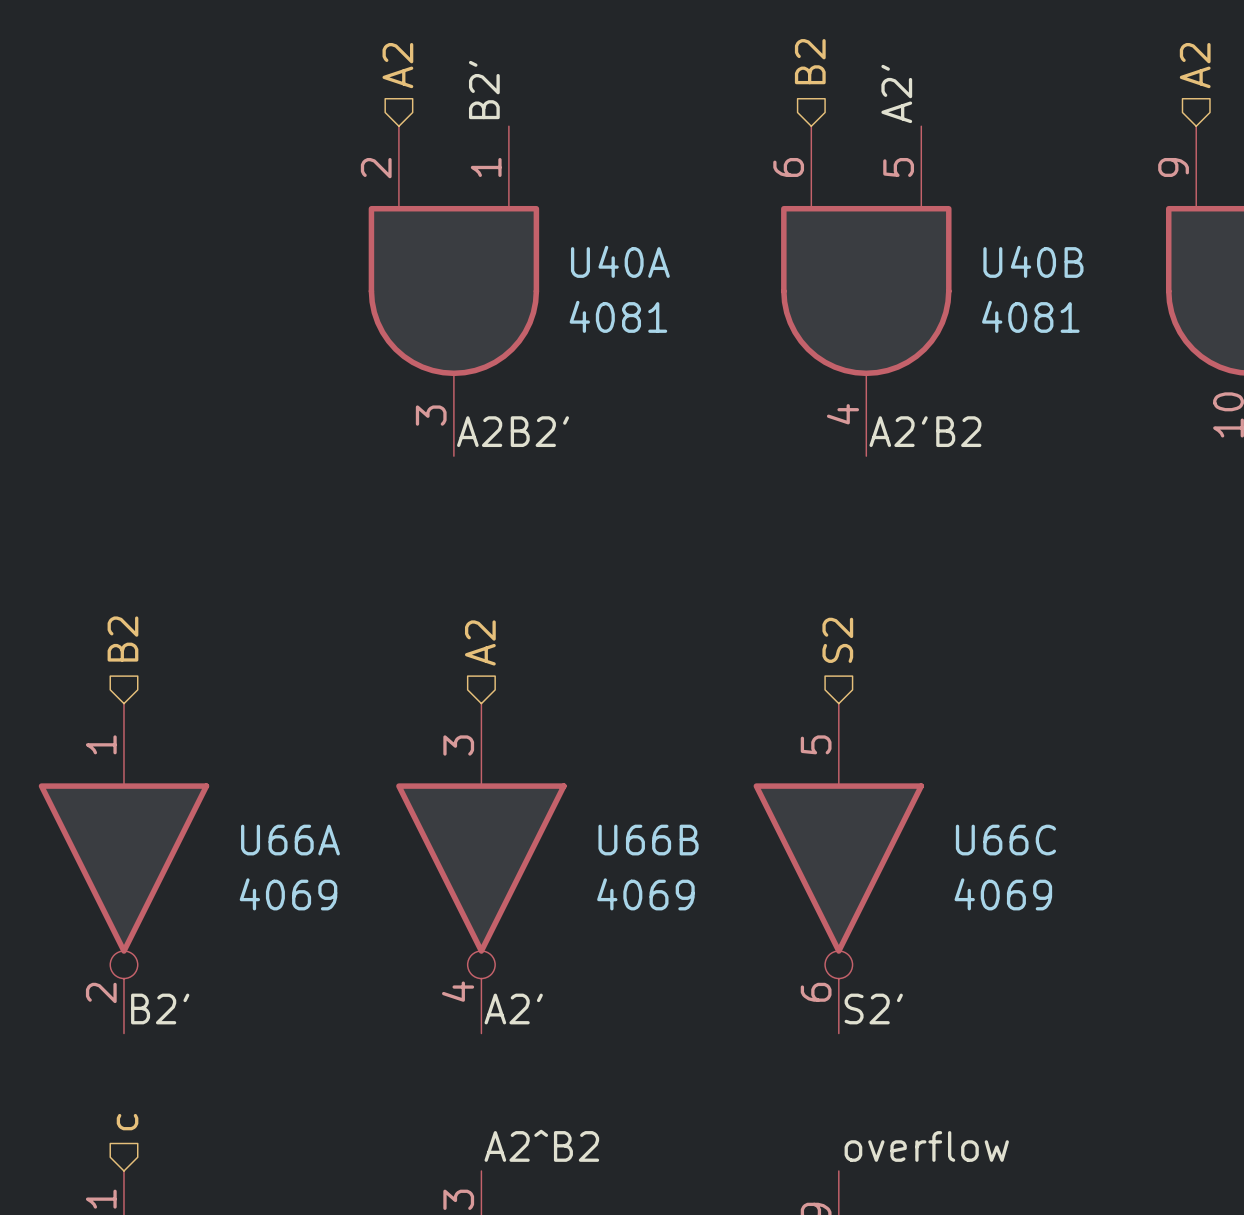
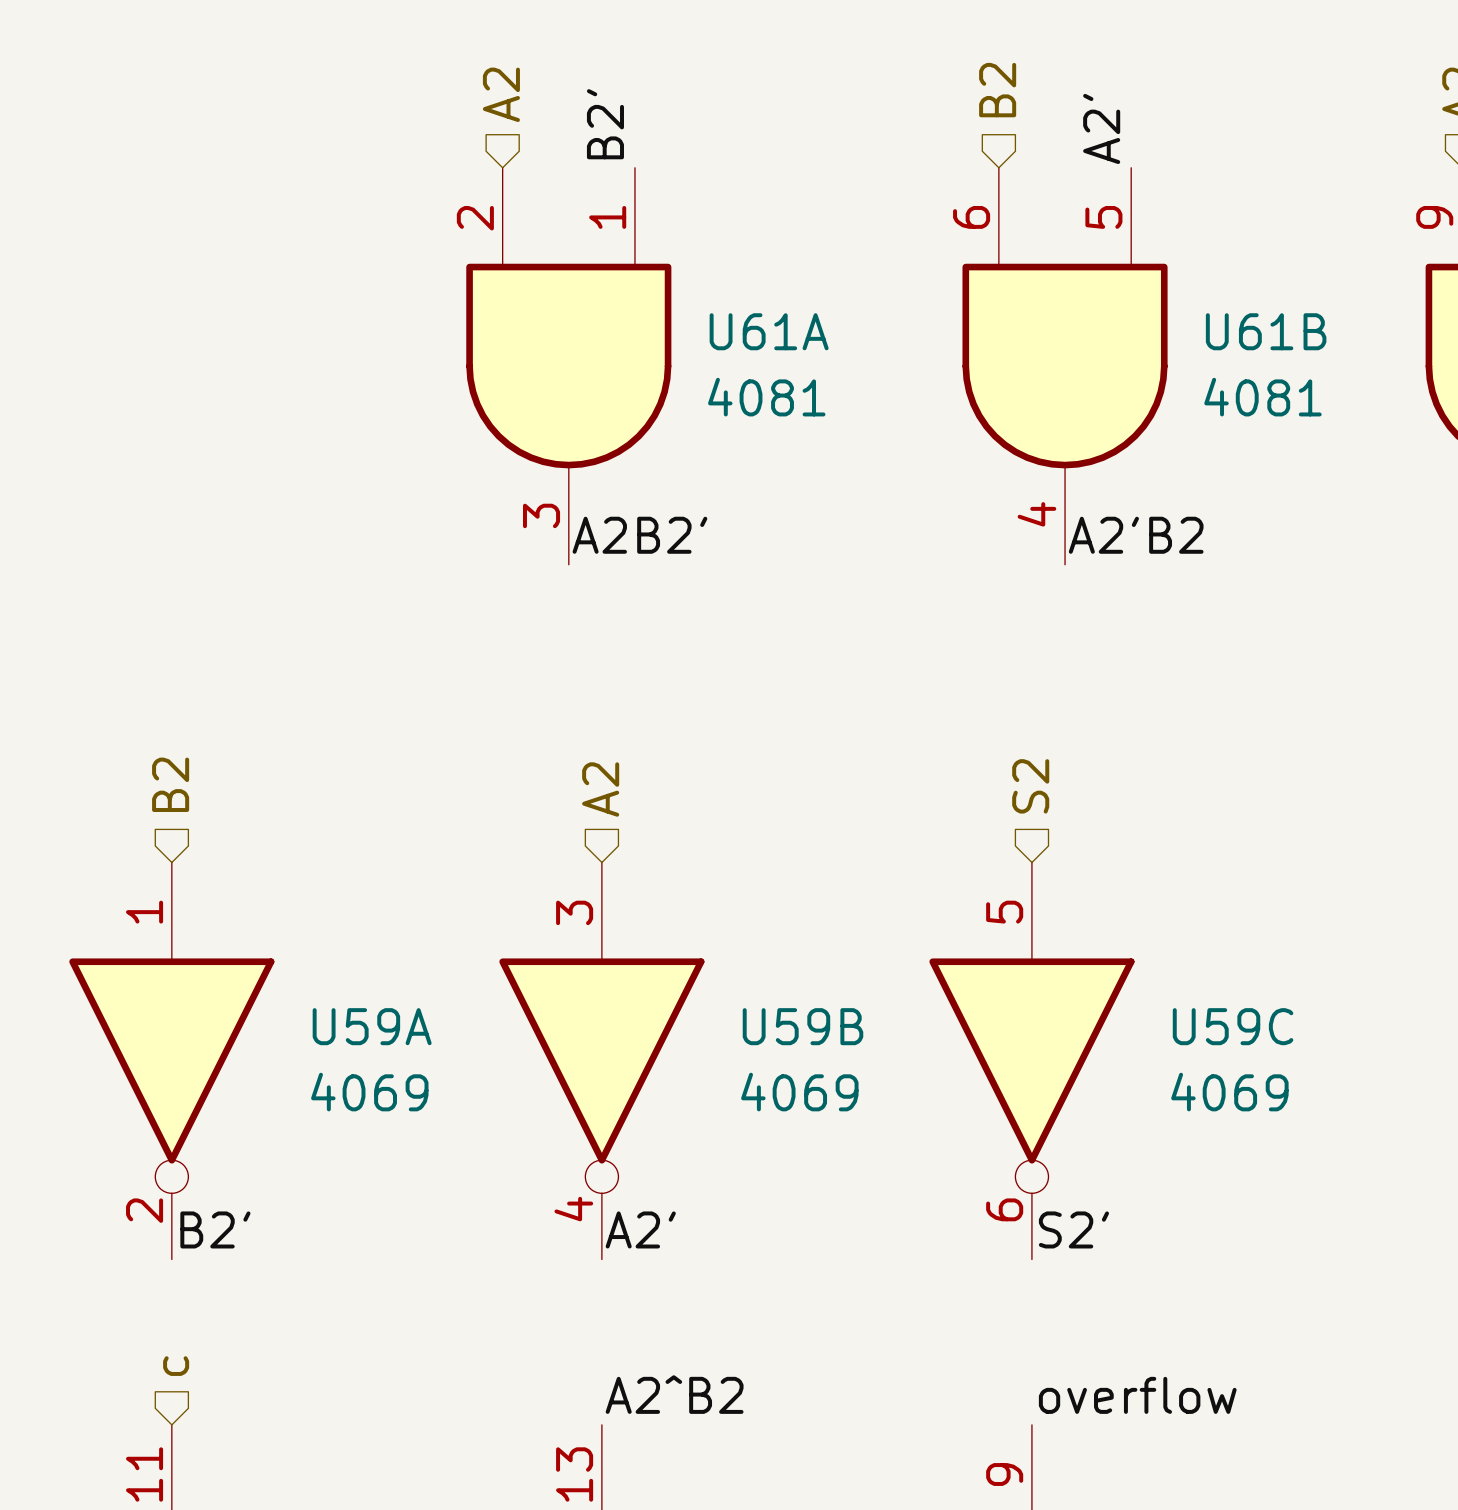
U40A name: U40A (620, 261) -> U61A (769, 331)
U40B name: U40B (1033, 261) -> U61B (1266, 331)
U66A name: U66A (290, 840) -> U59A (372, 1026)
U66B name: U66B (648, 840) -> U59B (802, 1026)
U66C name: U66C (1005, 840) -> U59C (1233, 1026)

